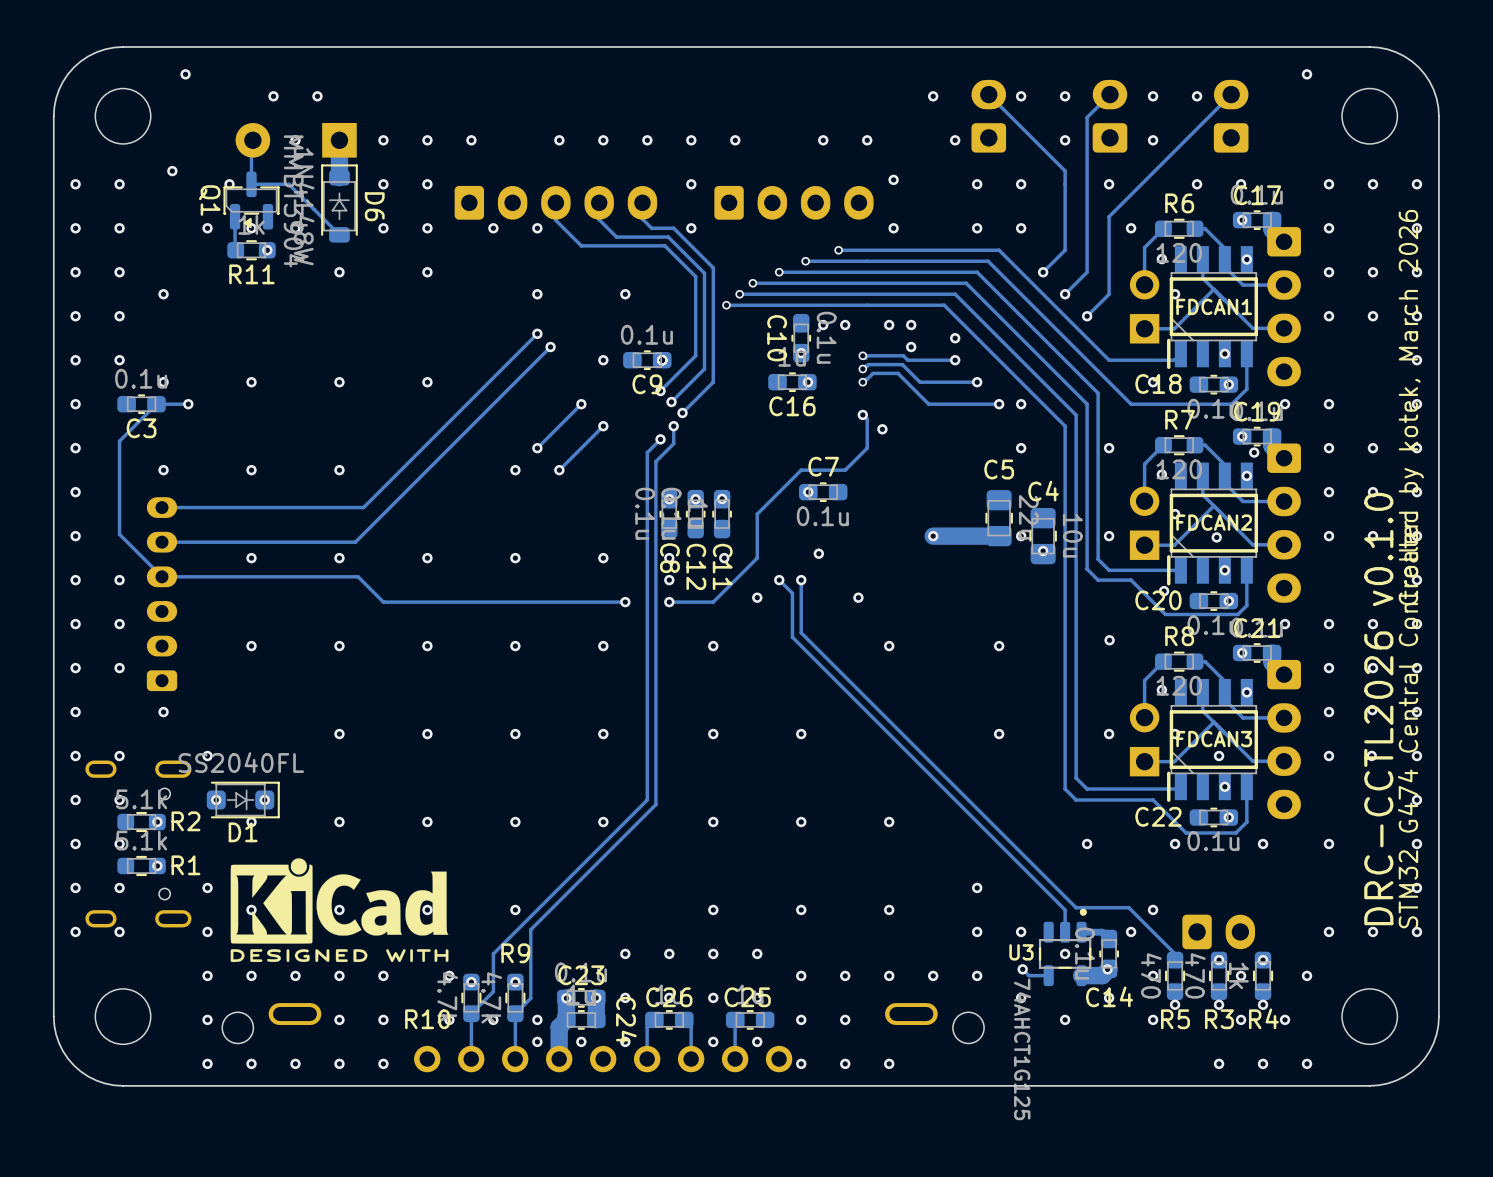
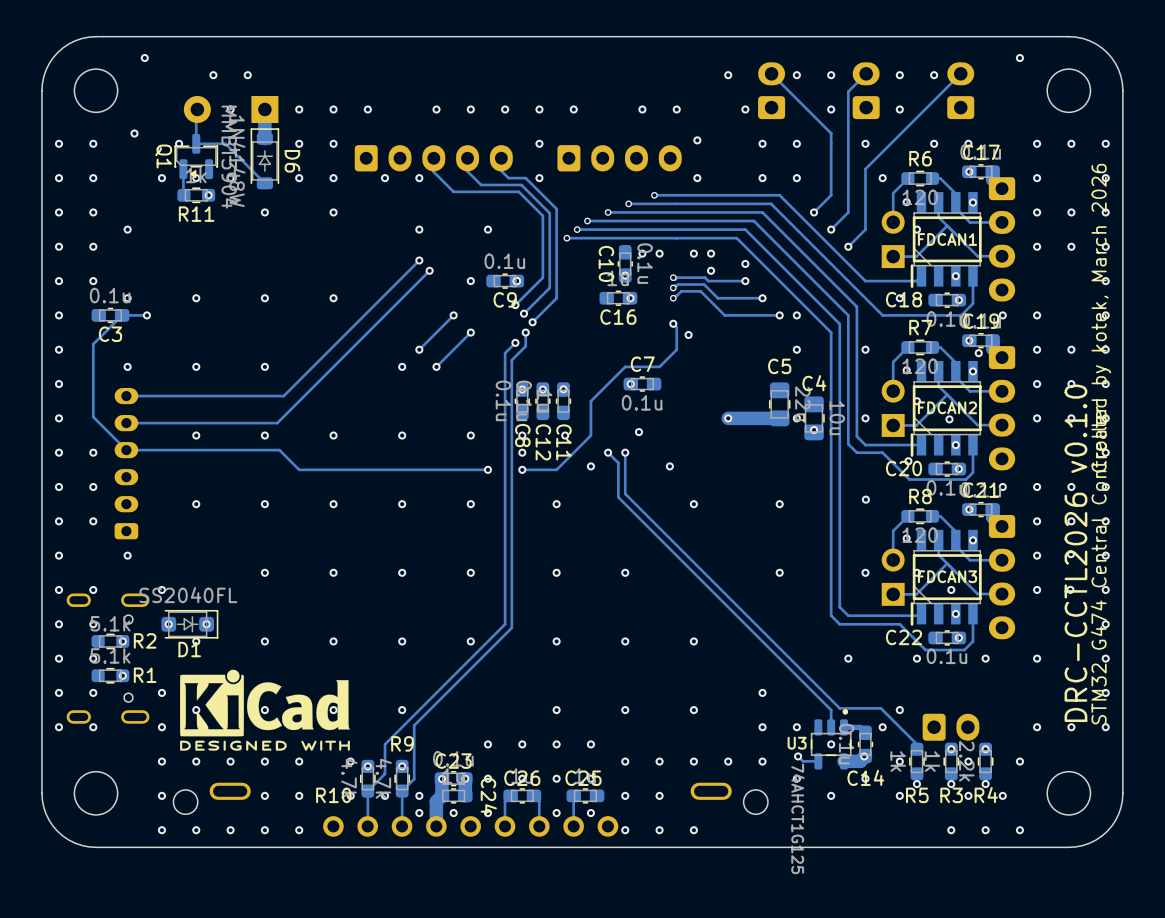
R5 value: 470 (1151, 975) -> 1k (898, 761)
R3 value: 470 (1195, 975) -> 1k (932, 761)
R4 value: 1k (1238, 975) -> 2.2k (966, 761)

